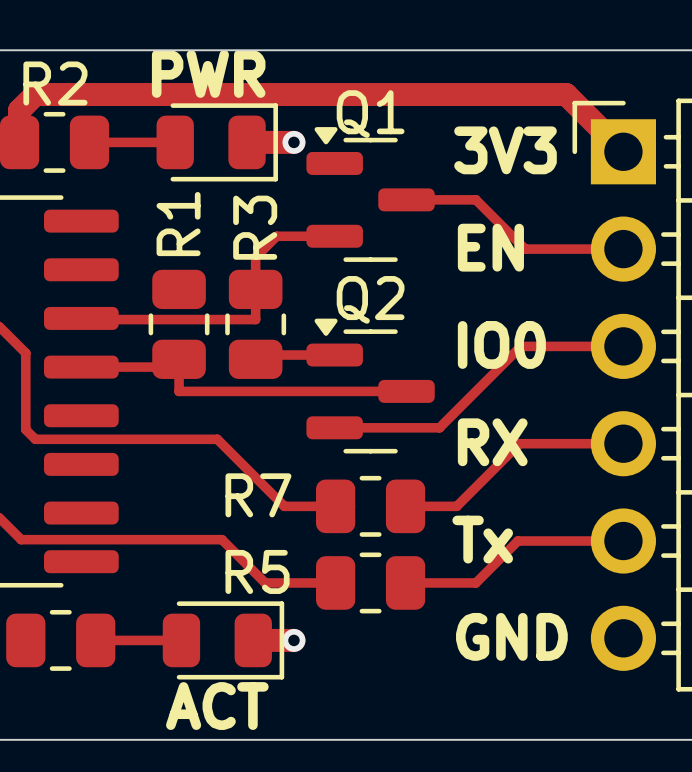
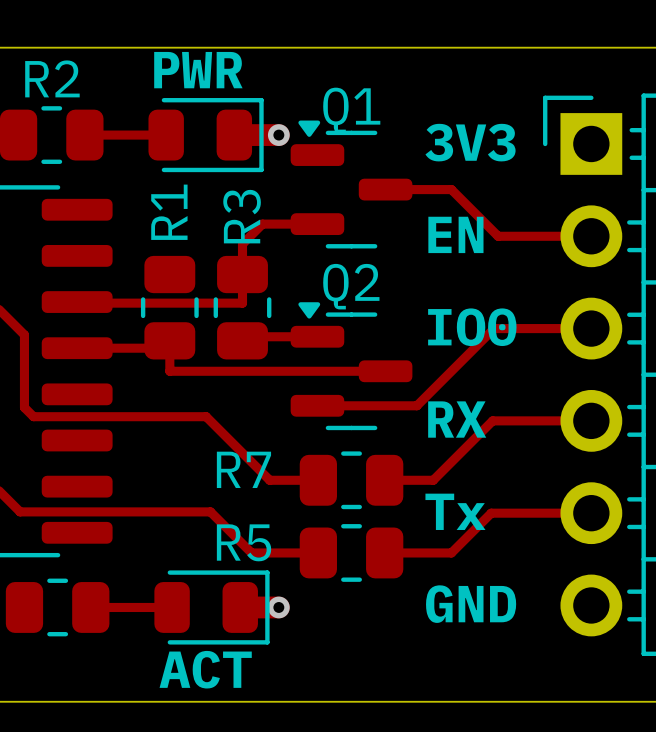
track: (19, 142) (19, 110) (35, 94) (566, 94) (623, 151) -> none

